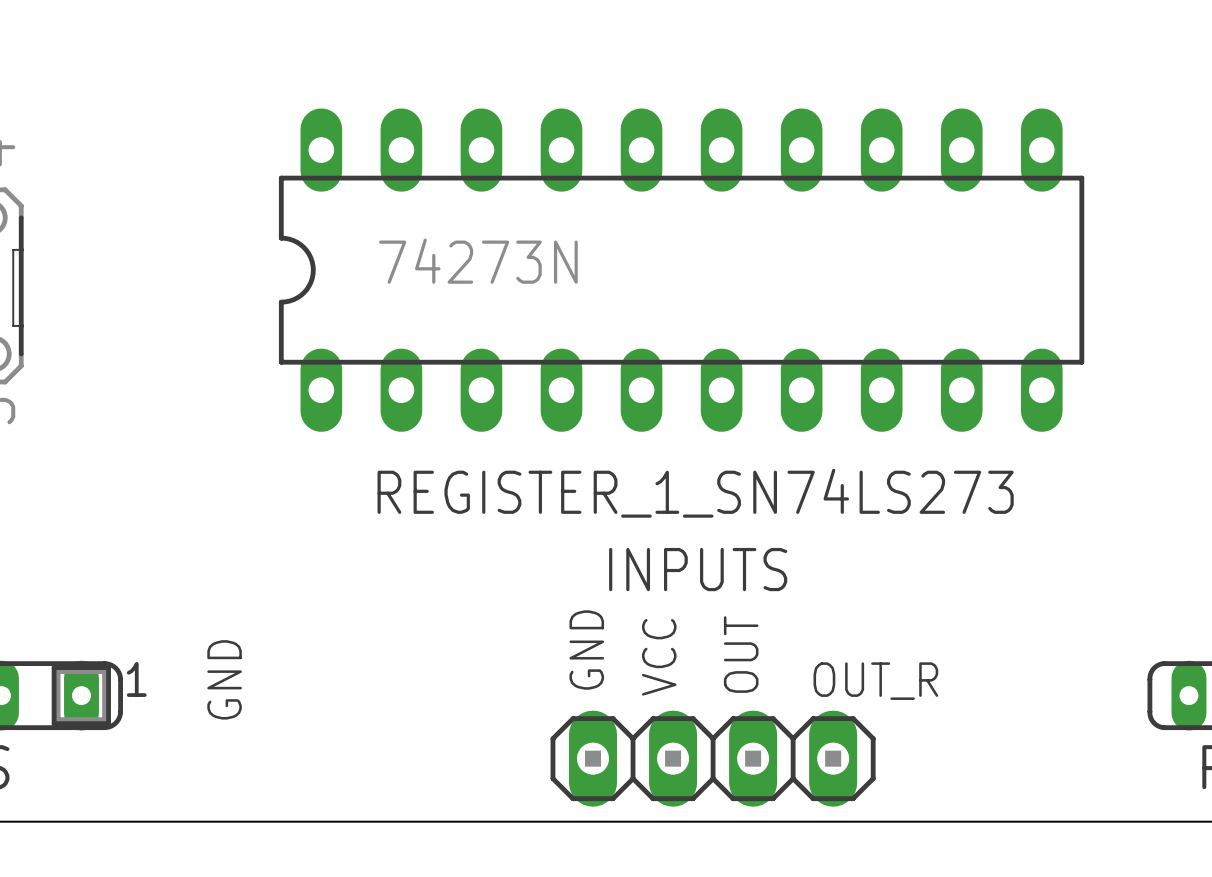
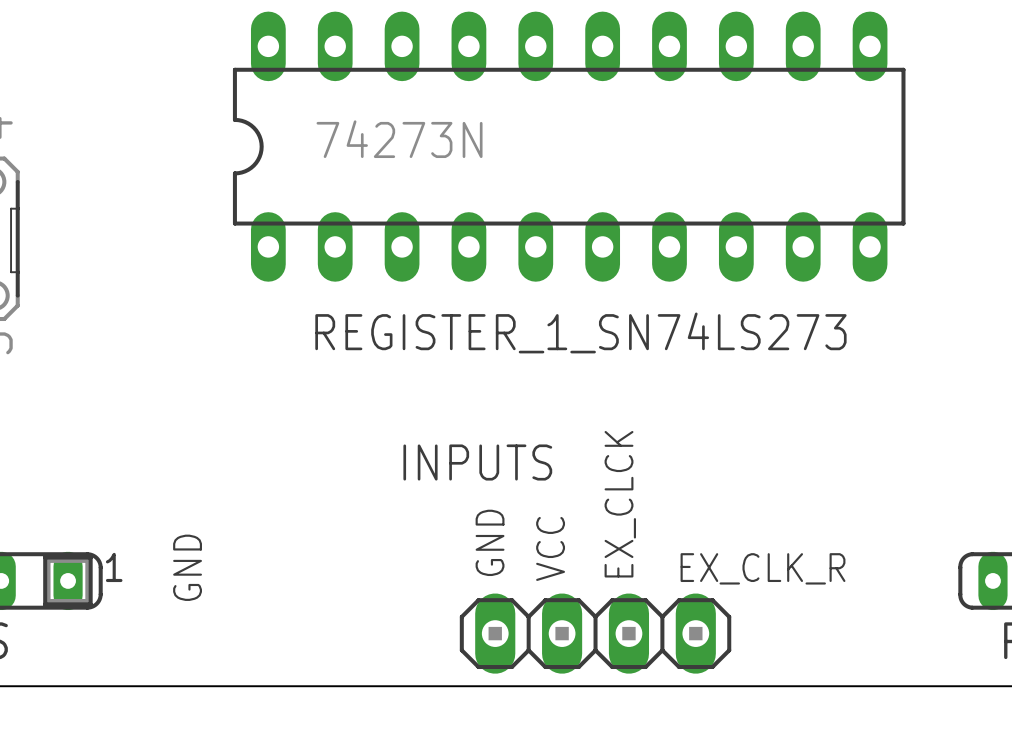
REGISTER_1_SN74LS273 position: (681, 270) -> (569, 146)
text position: INPUTS (698, 569) -> INPUTS (477, 462)
text: OUT (741, 654) -> EX_CLCK (620, 504)
text: OUT_R (875, 681) -> EX_CLK_R (763, 568)

